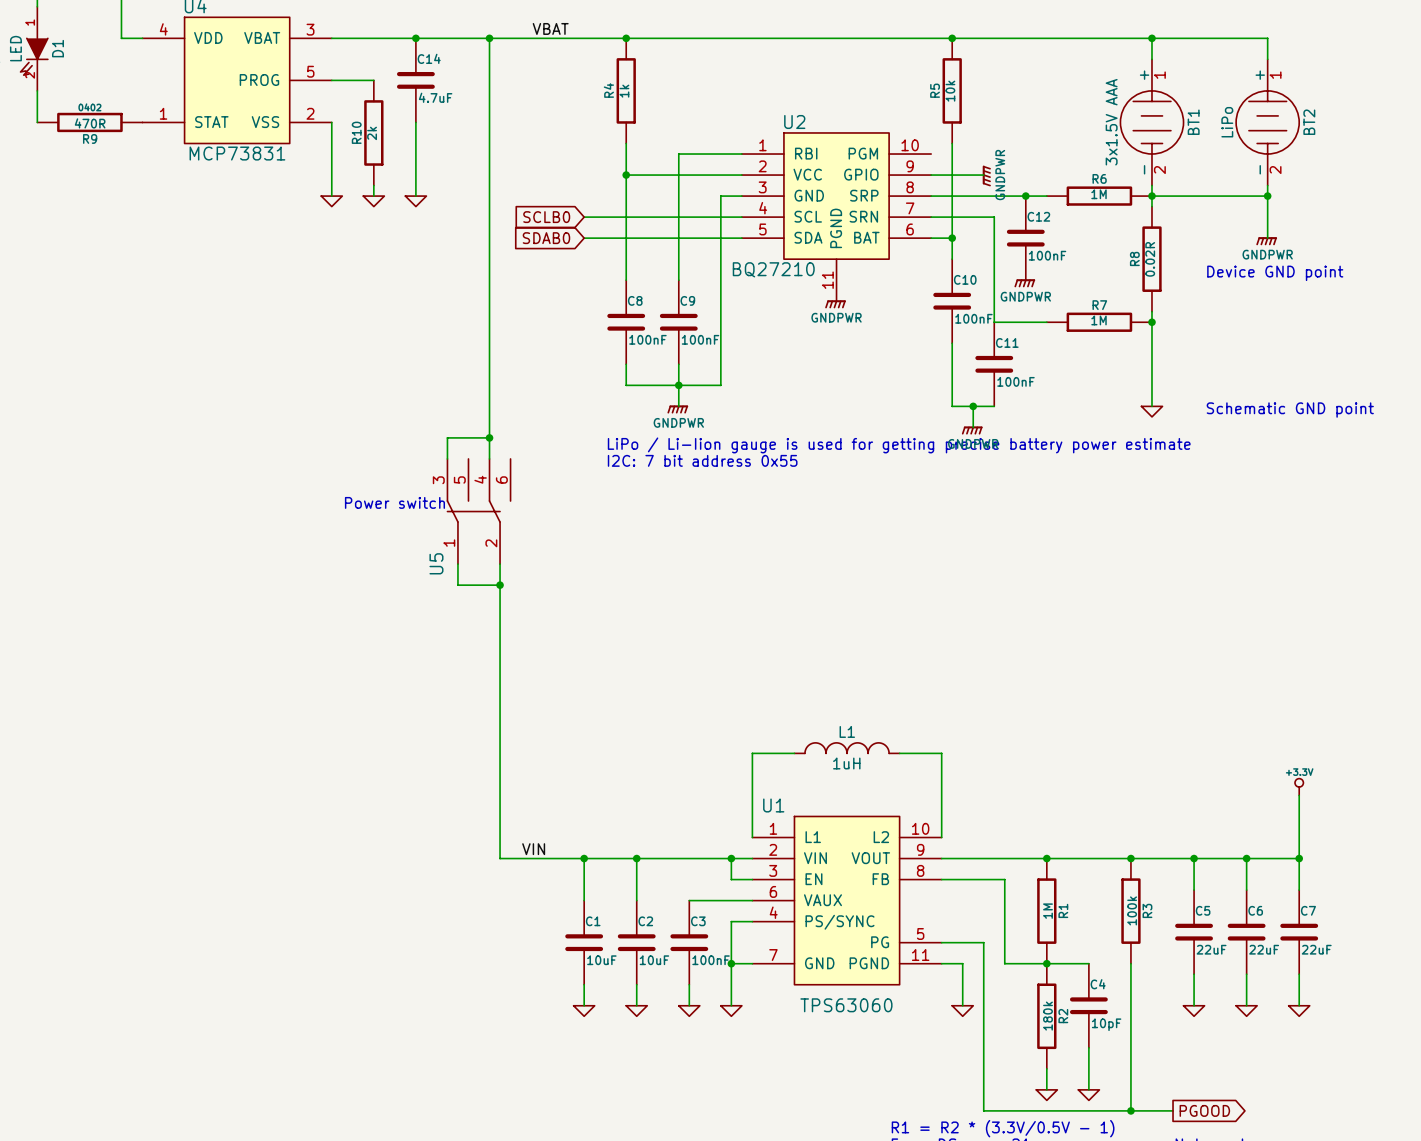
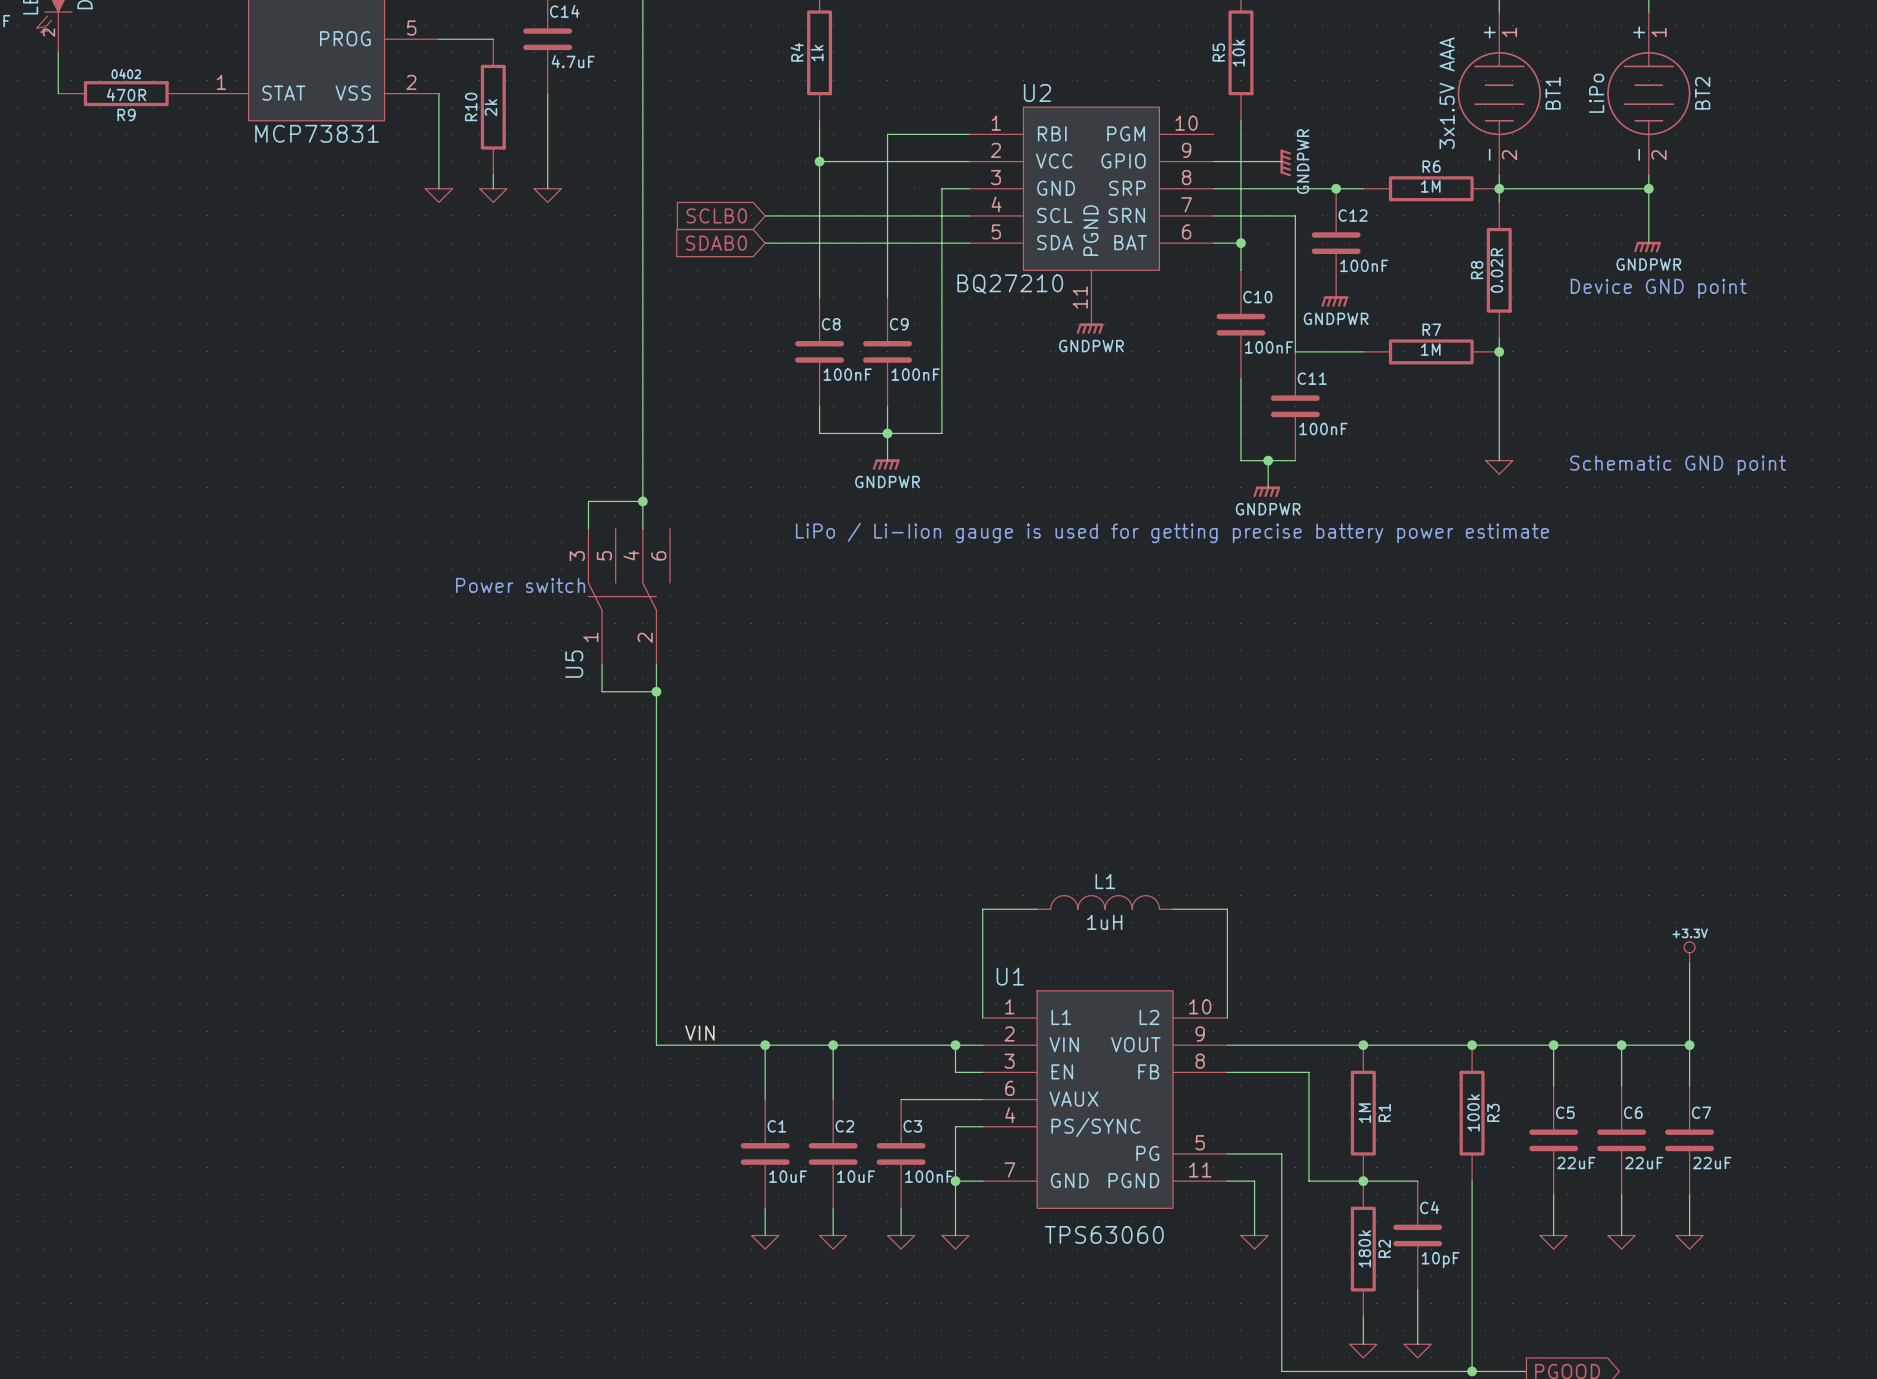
text: LiPo / Li-Iion gauge is used for getting precise battery power estimate (899, 445) -> none
text: I2C: 7 bit address 0x55 (702, 460) -> LiPo / Li-Iion gauge is used for getting precise battery power estimate (1172, 533)

